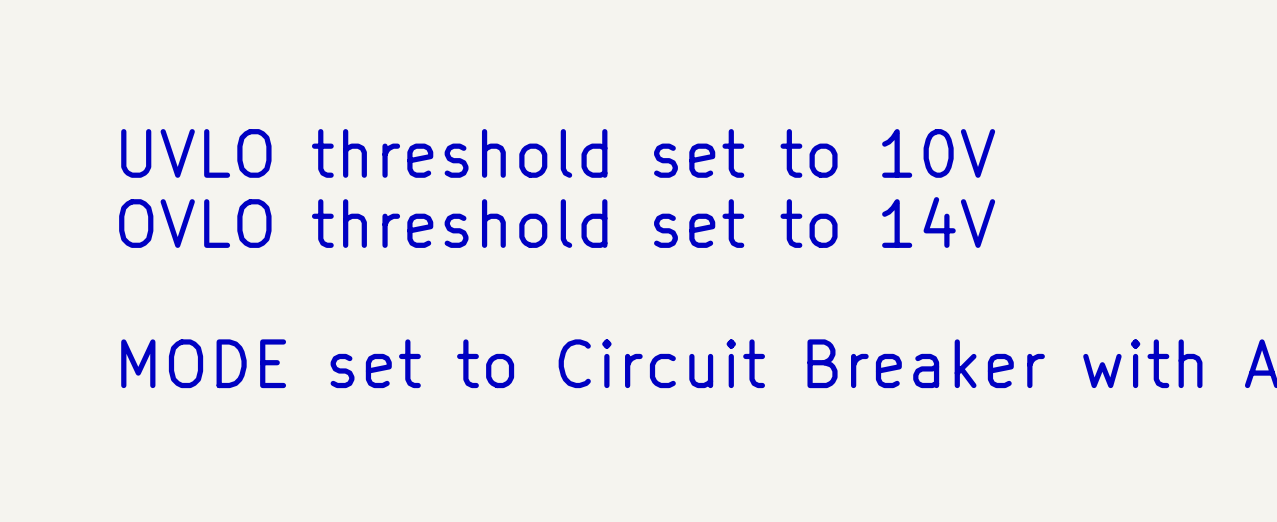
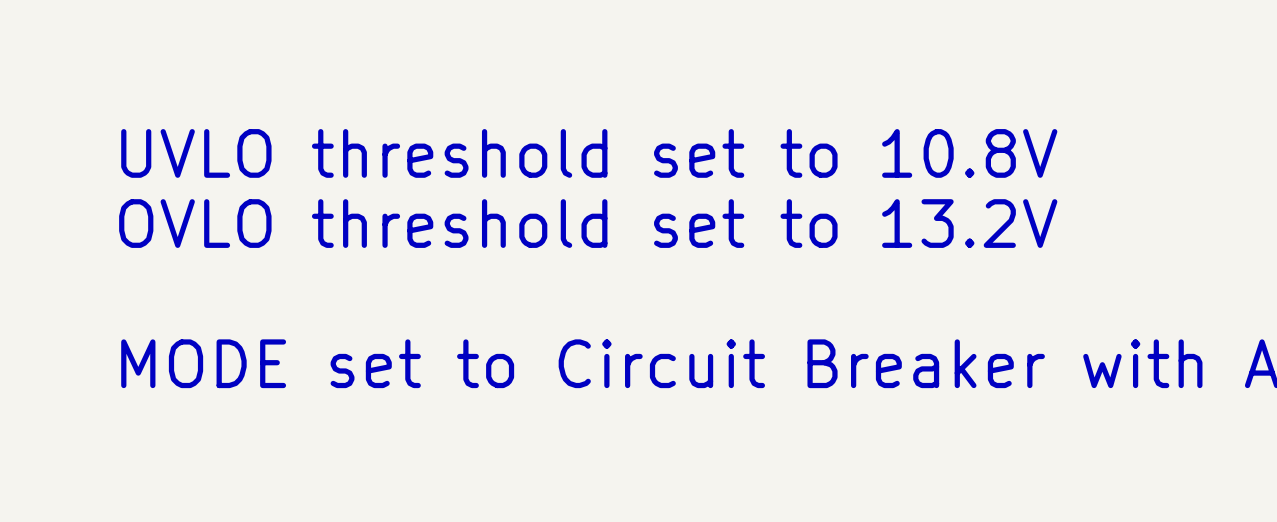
text: UVLO threshold set to 10V (558, 153) -> UVLO threshold set to 10.8V (589, 153)
text: OVLO threshold set to 14V (557, 222) -> OVLO threshold set to 13.2V (588, 223)

